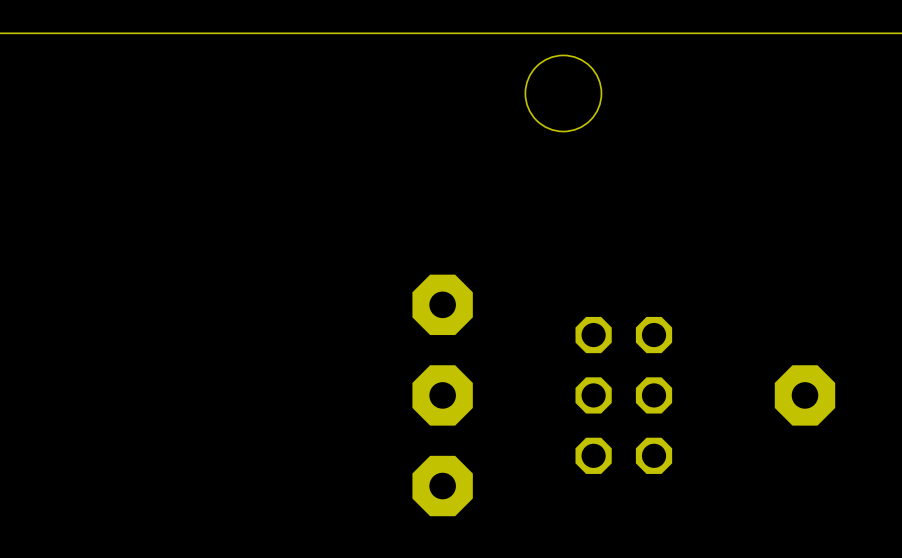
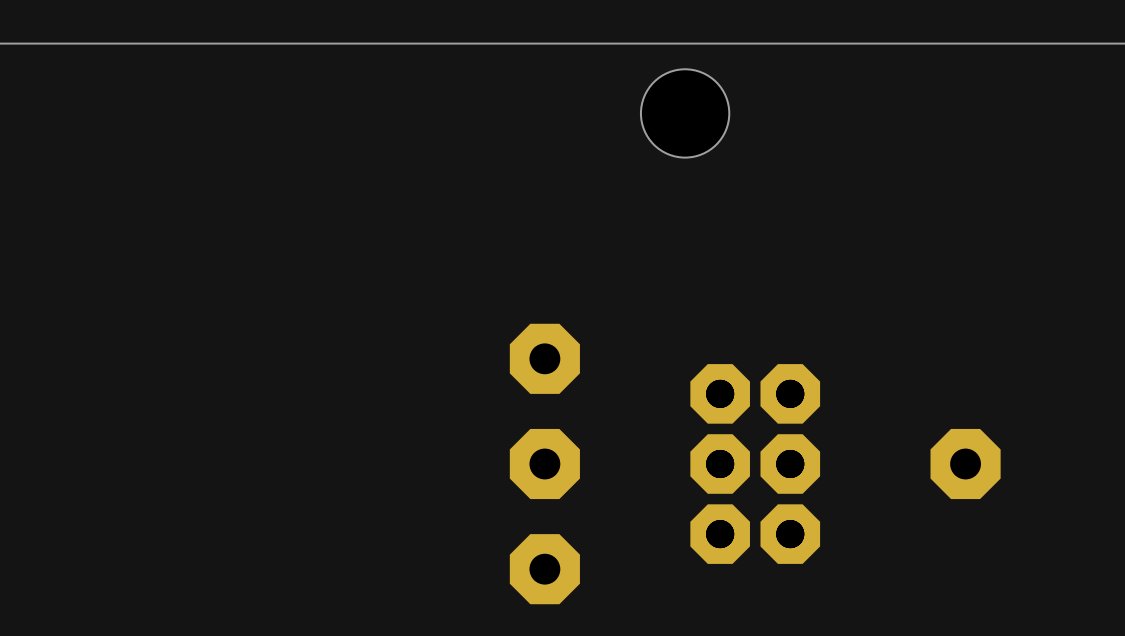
part: none -> (720, 393)
part: none -> (790, 393)
part: none -> (720, 464)
part: none -> (790, 464)
part: none -> (720, 534)
part: none -> (790, 534)

